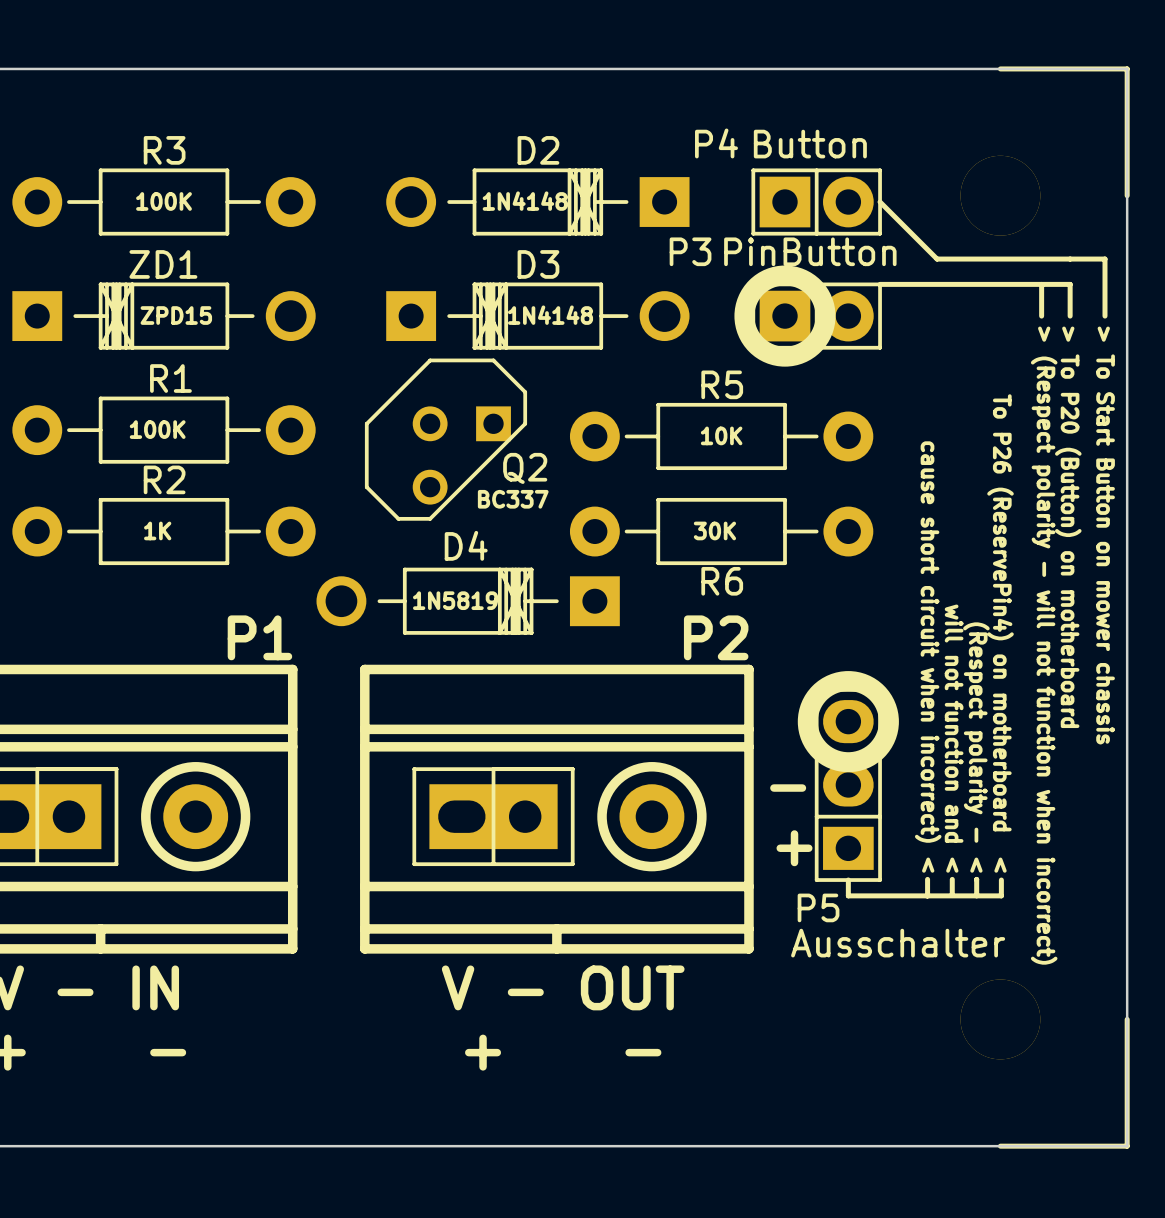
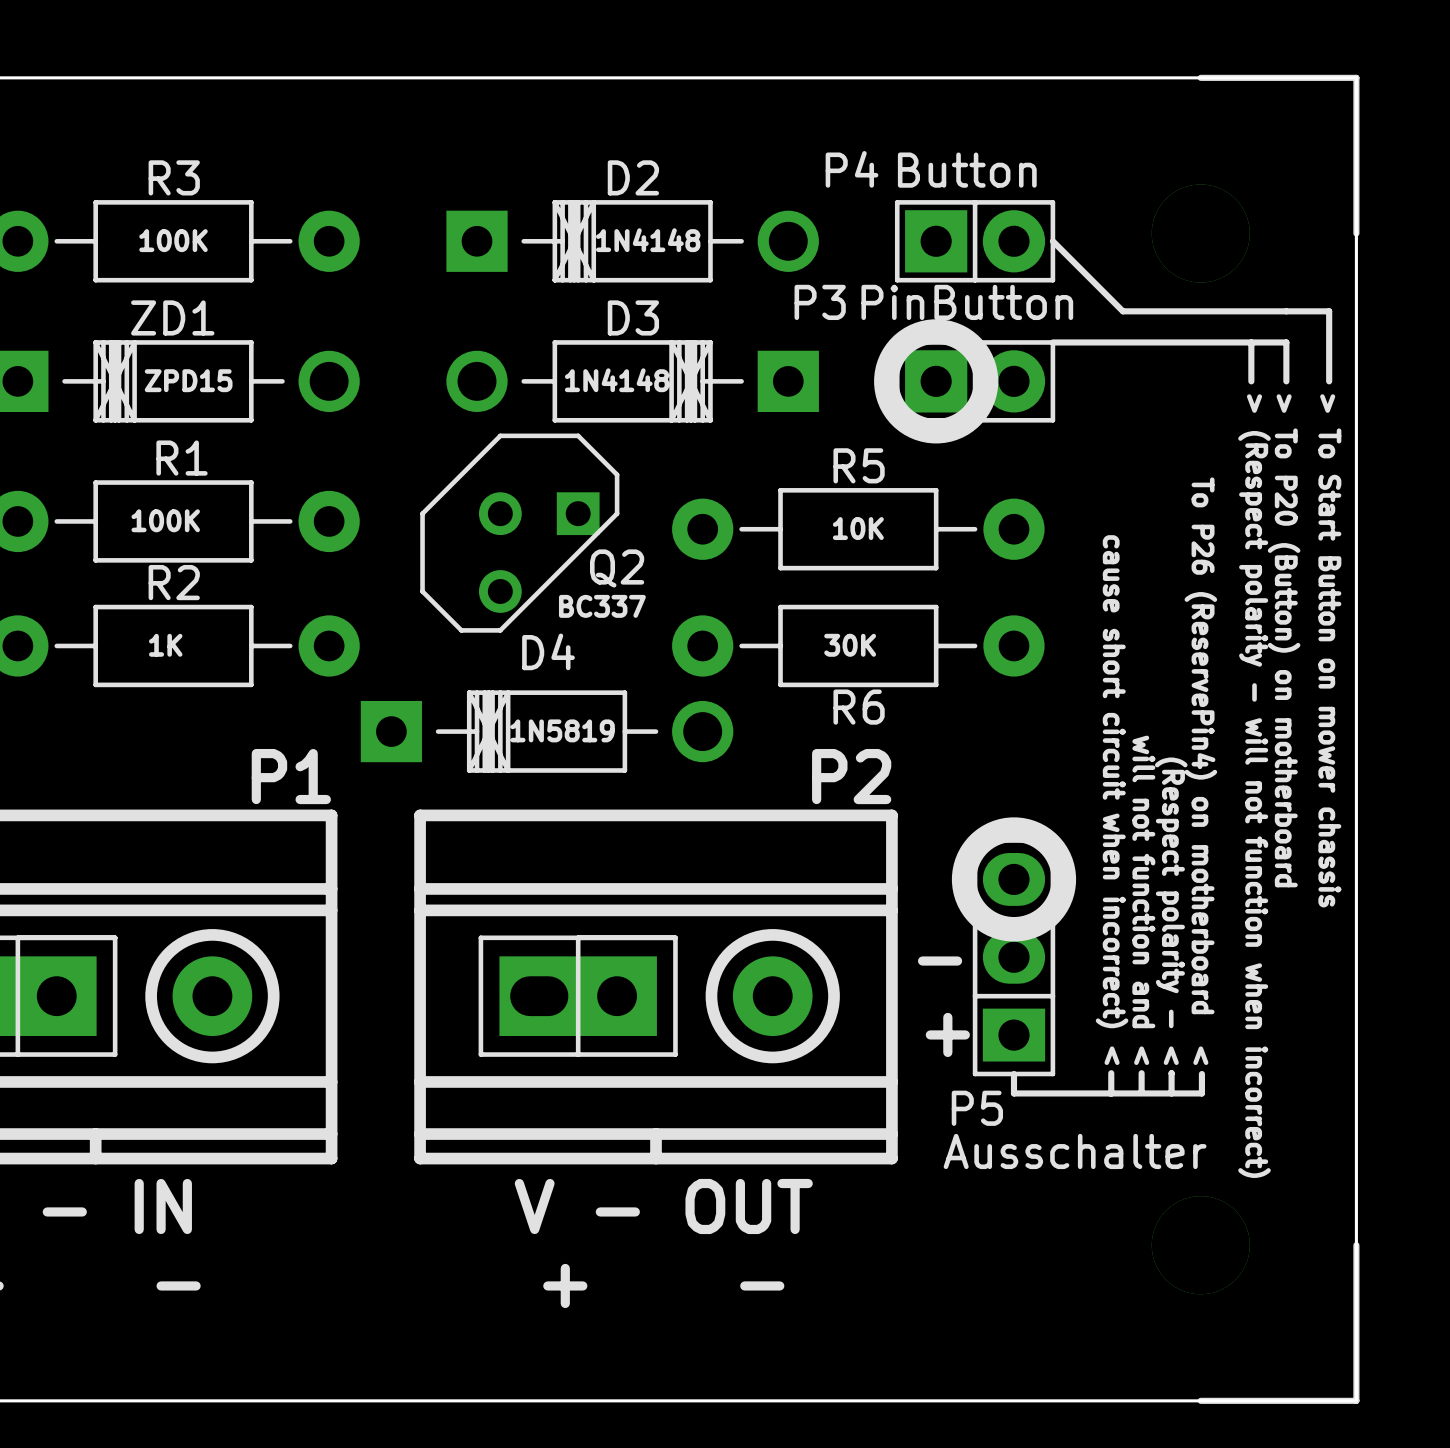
D2 rotation: 0° (537, 202) -> 180° (632, 241)
D3 rotation: 0° (537, 316) -> 180° (632, 381)
D4 rotation: 0° (468, 601) -> 180° (547, 731)

